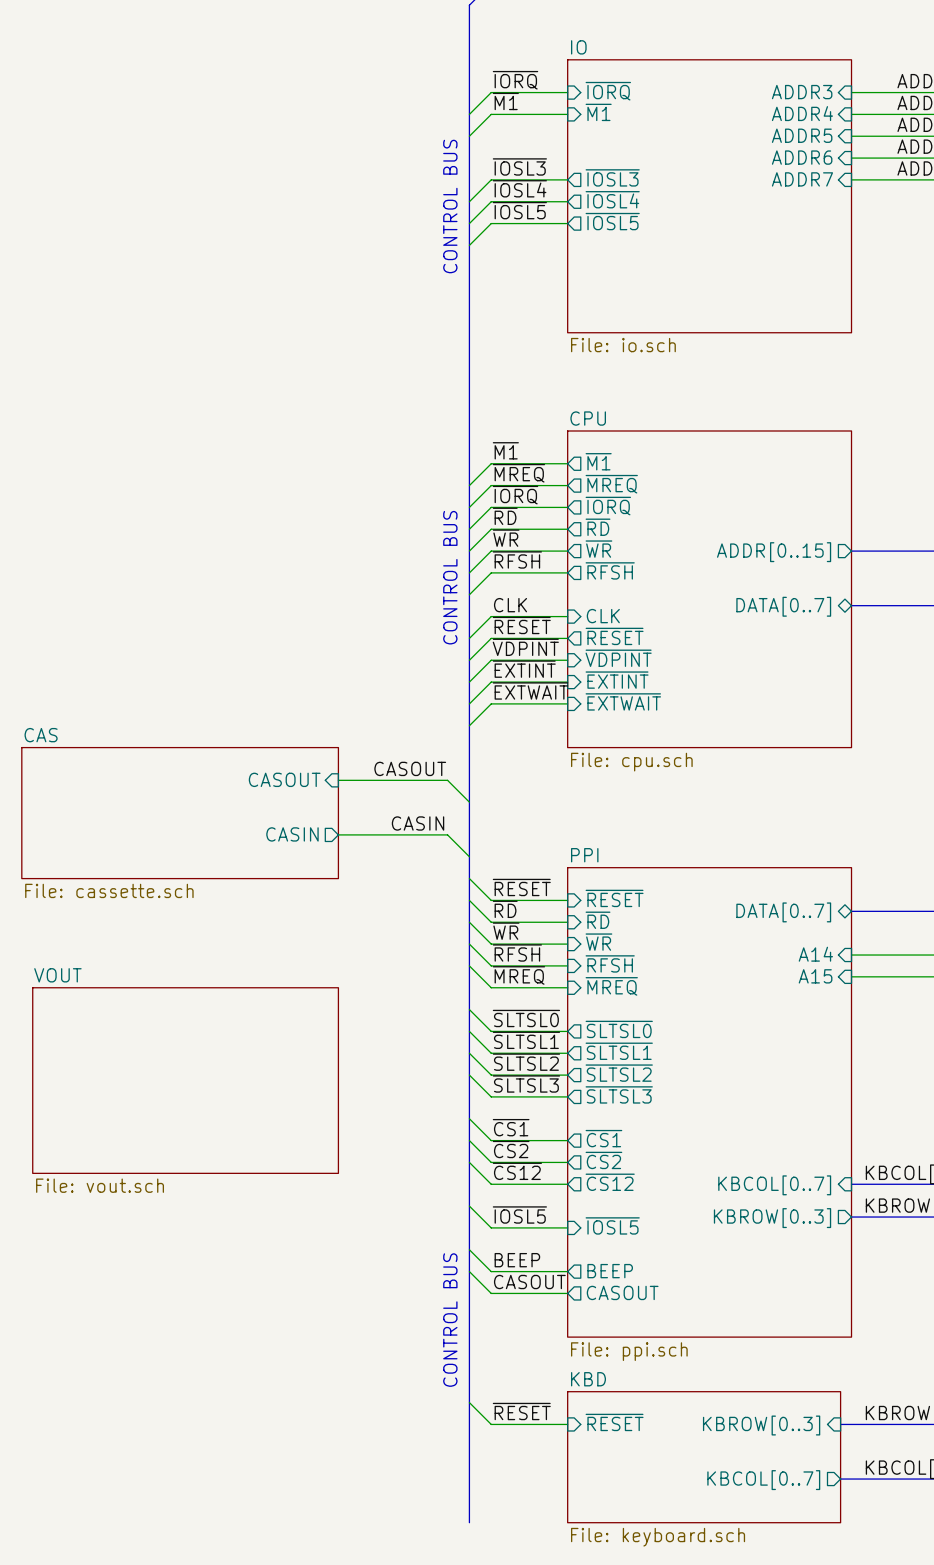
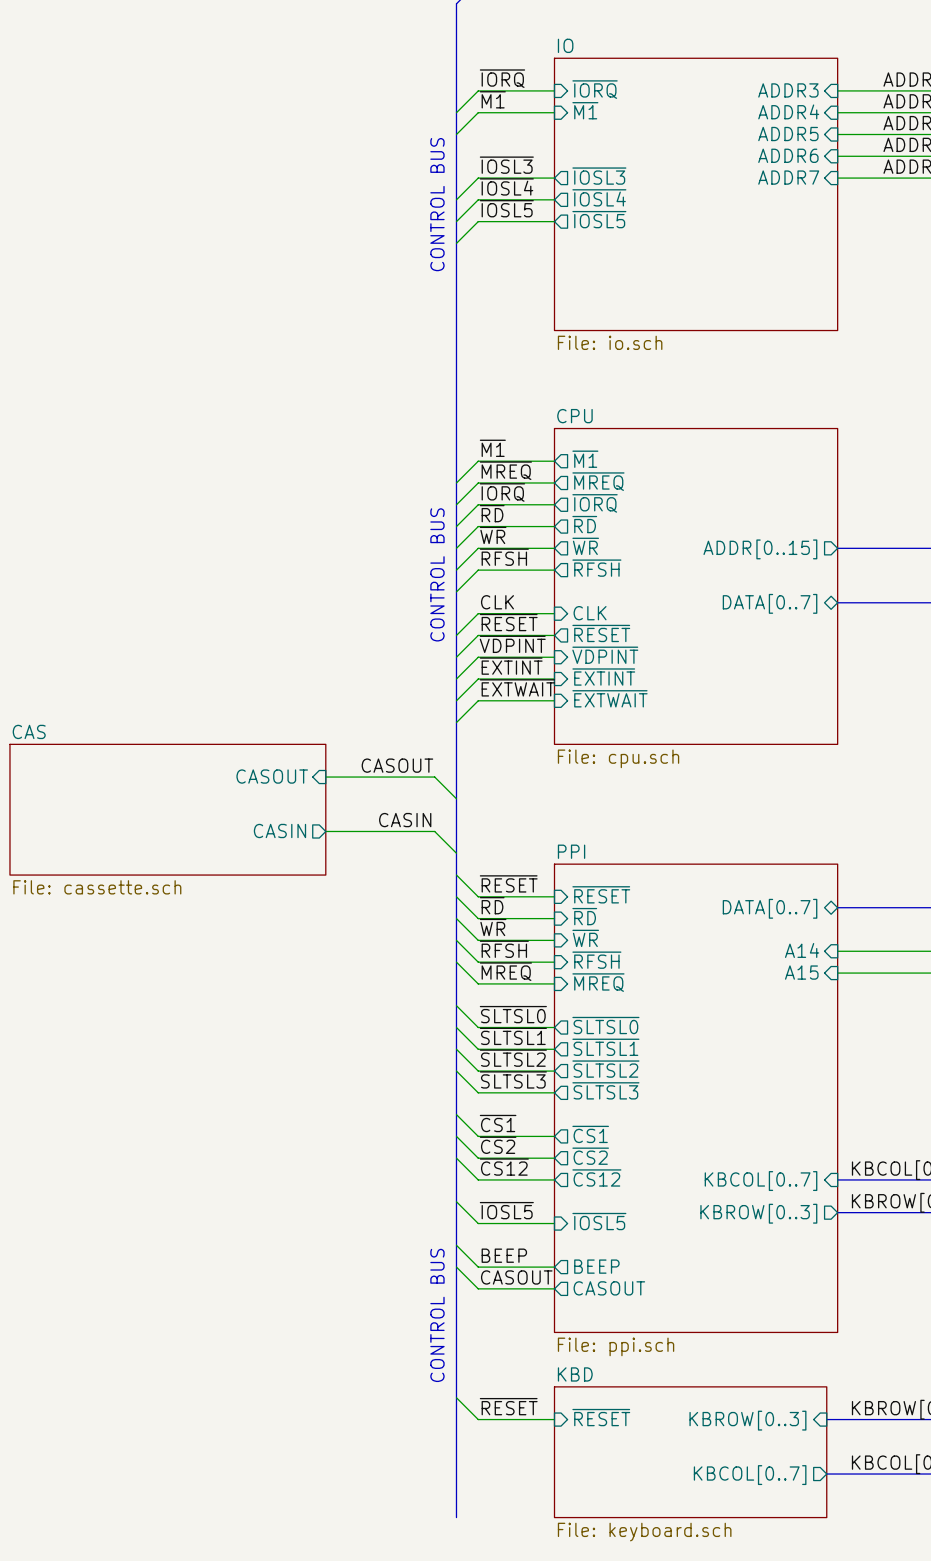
sheet VOUT: File: vout.sch (185, 1080) -> none

